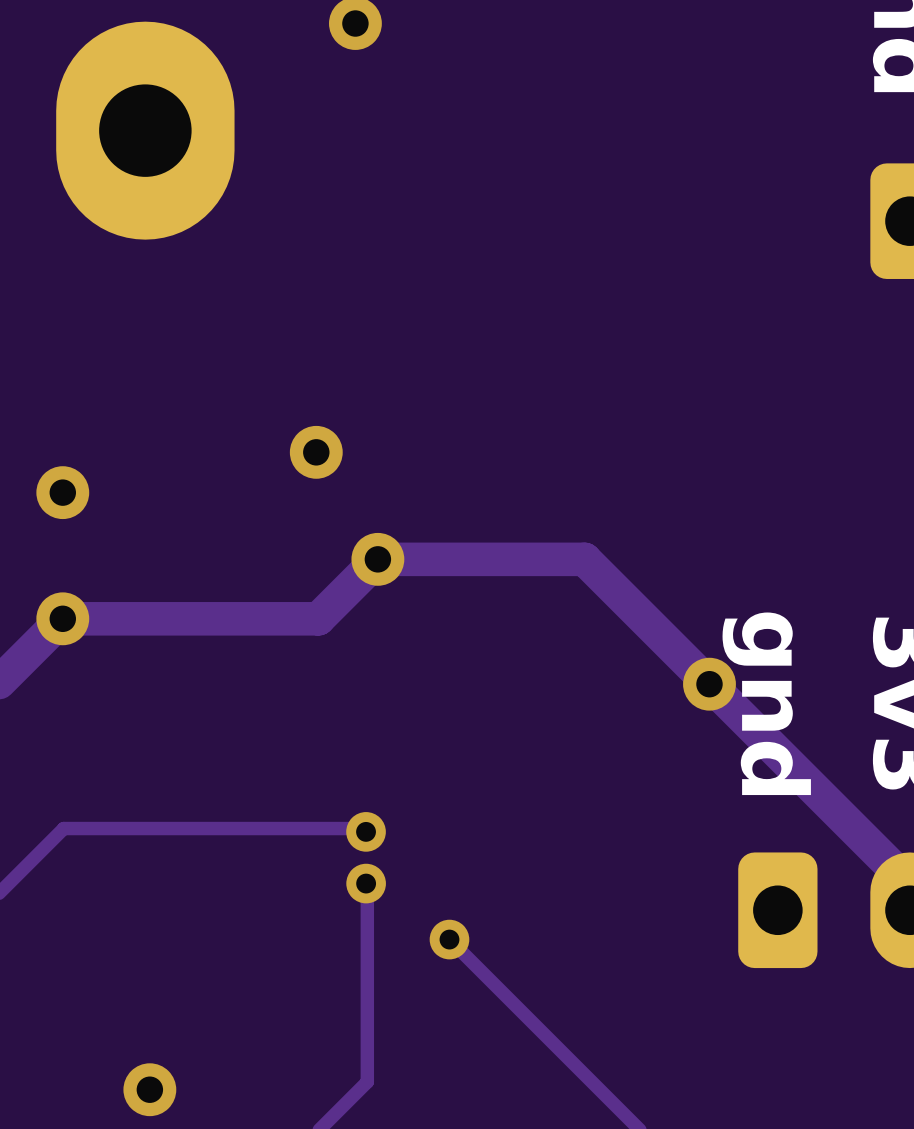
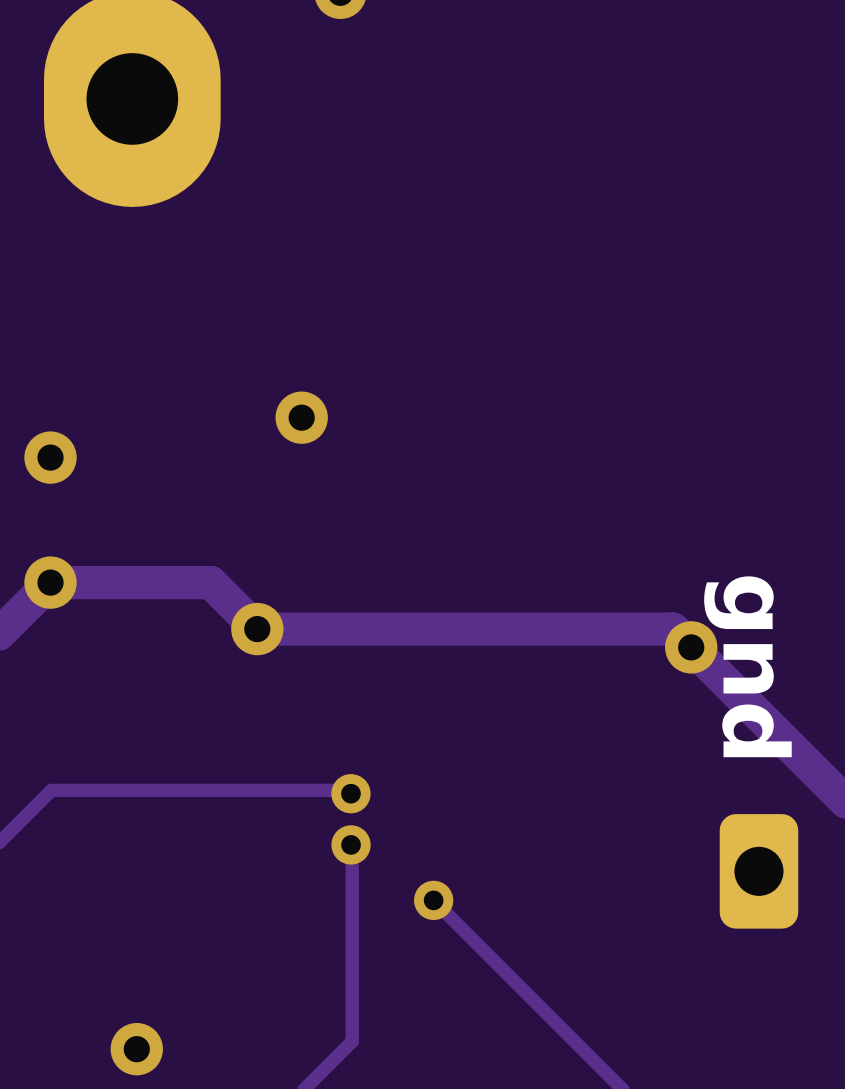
via position: (377, 559) -> (257, 629)
track: (224, 618) (318, 618) (377, 559) (584, 559) (690, 665) -> (210, 582) (257, 629) (672, 629)

